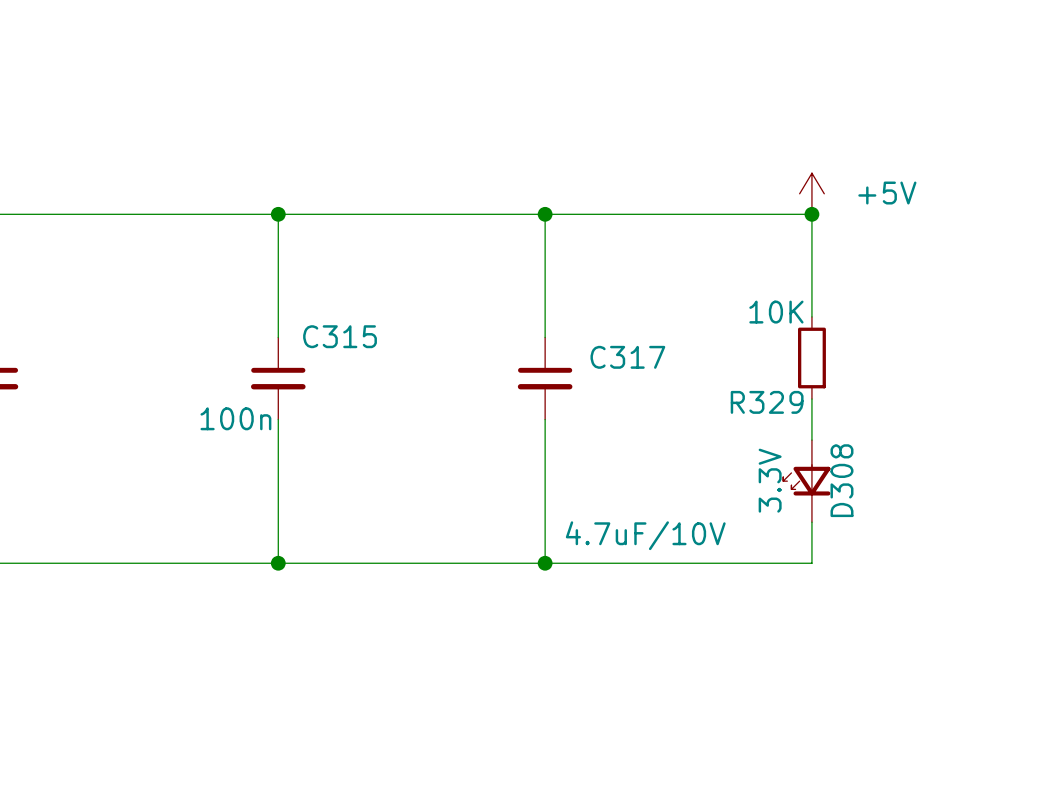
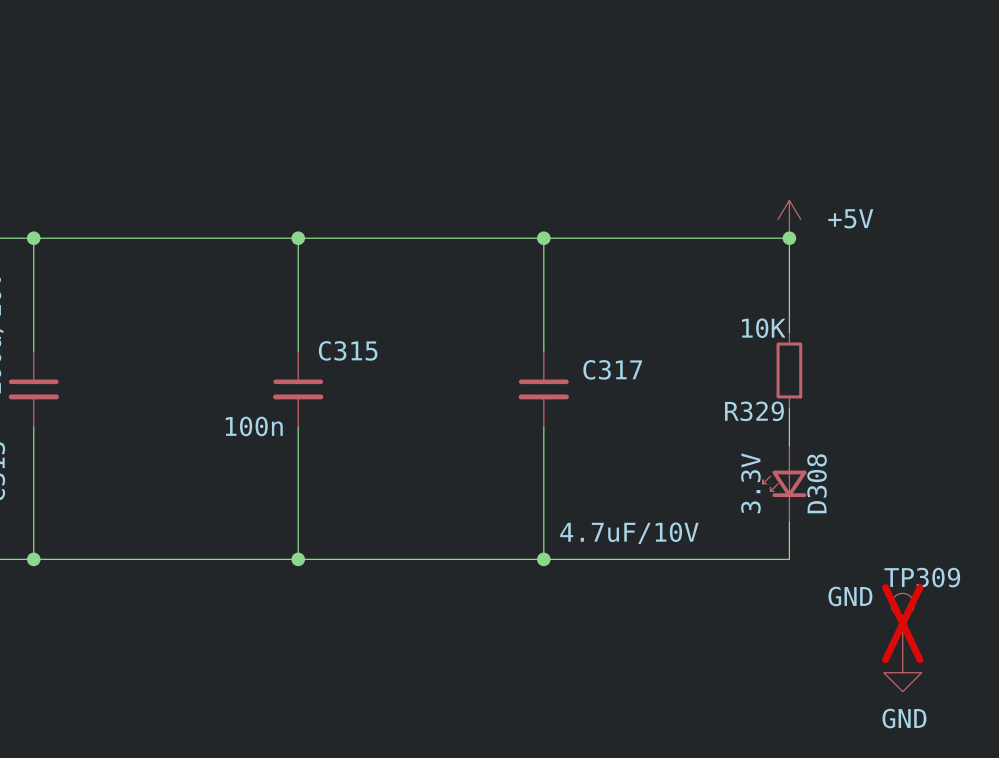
TP309: none -> GND (902, 623)
power symbol: none -> GND (902, 672)

